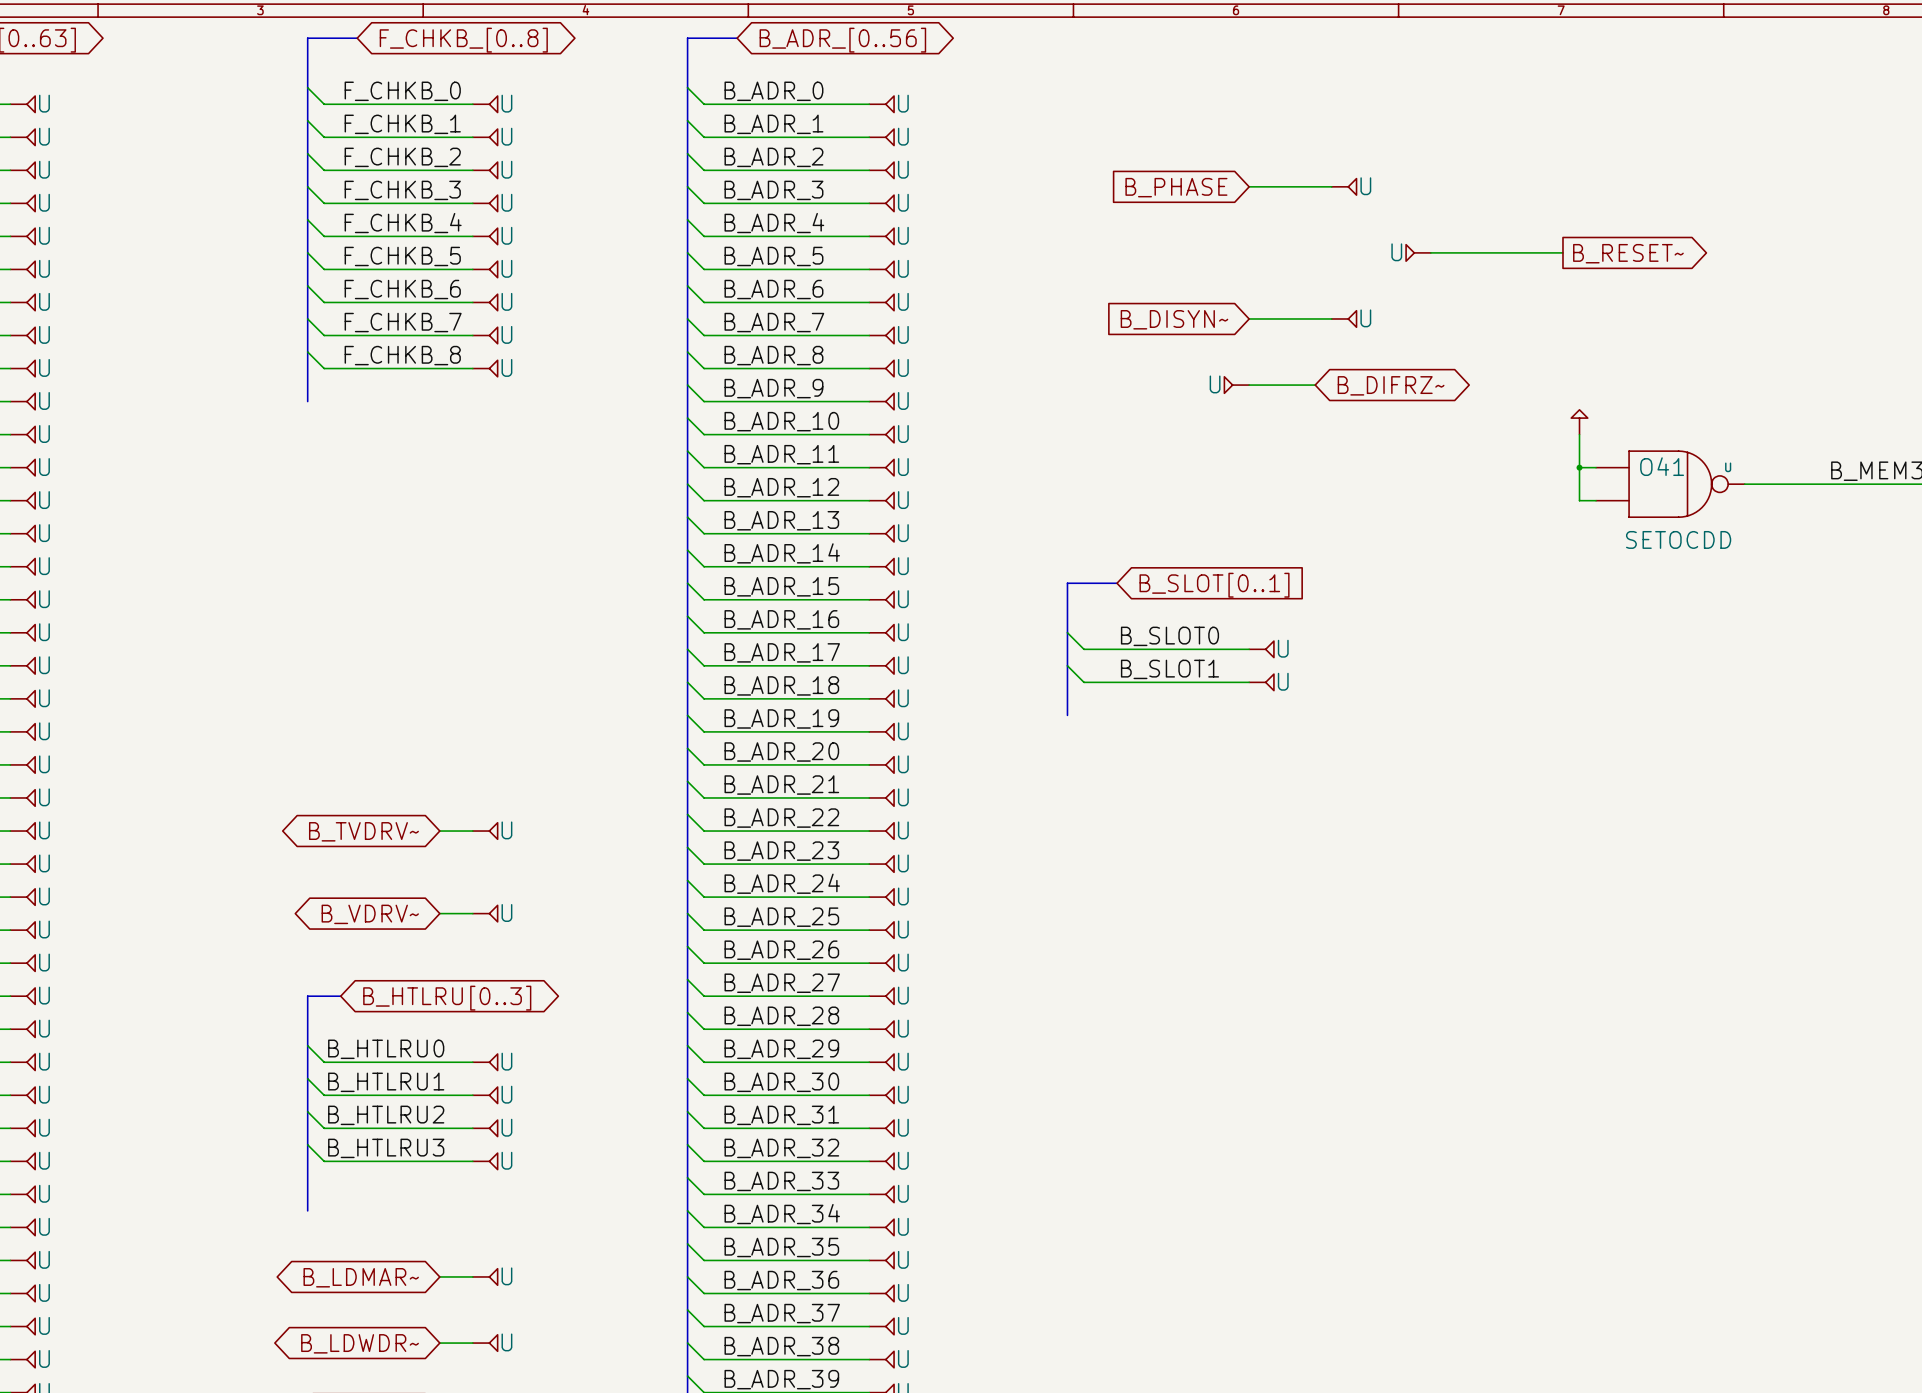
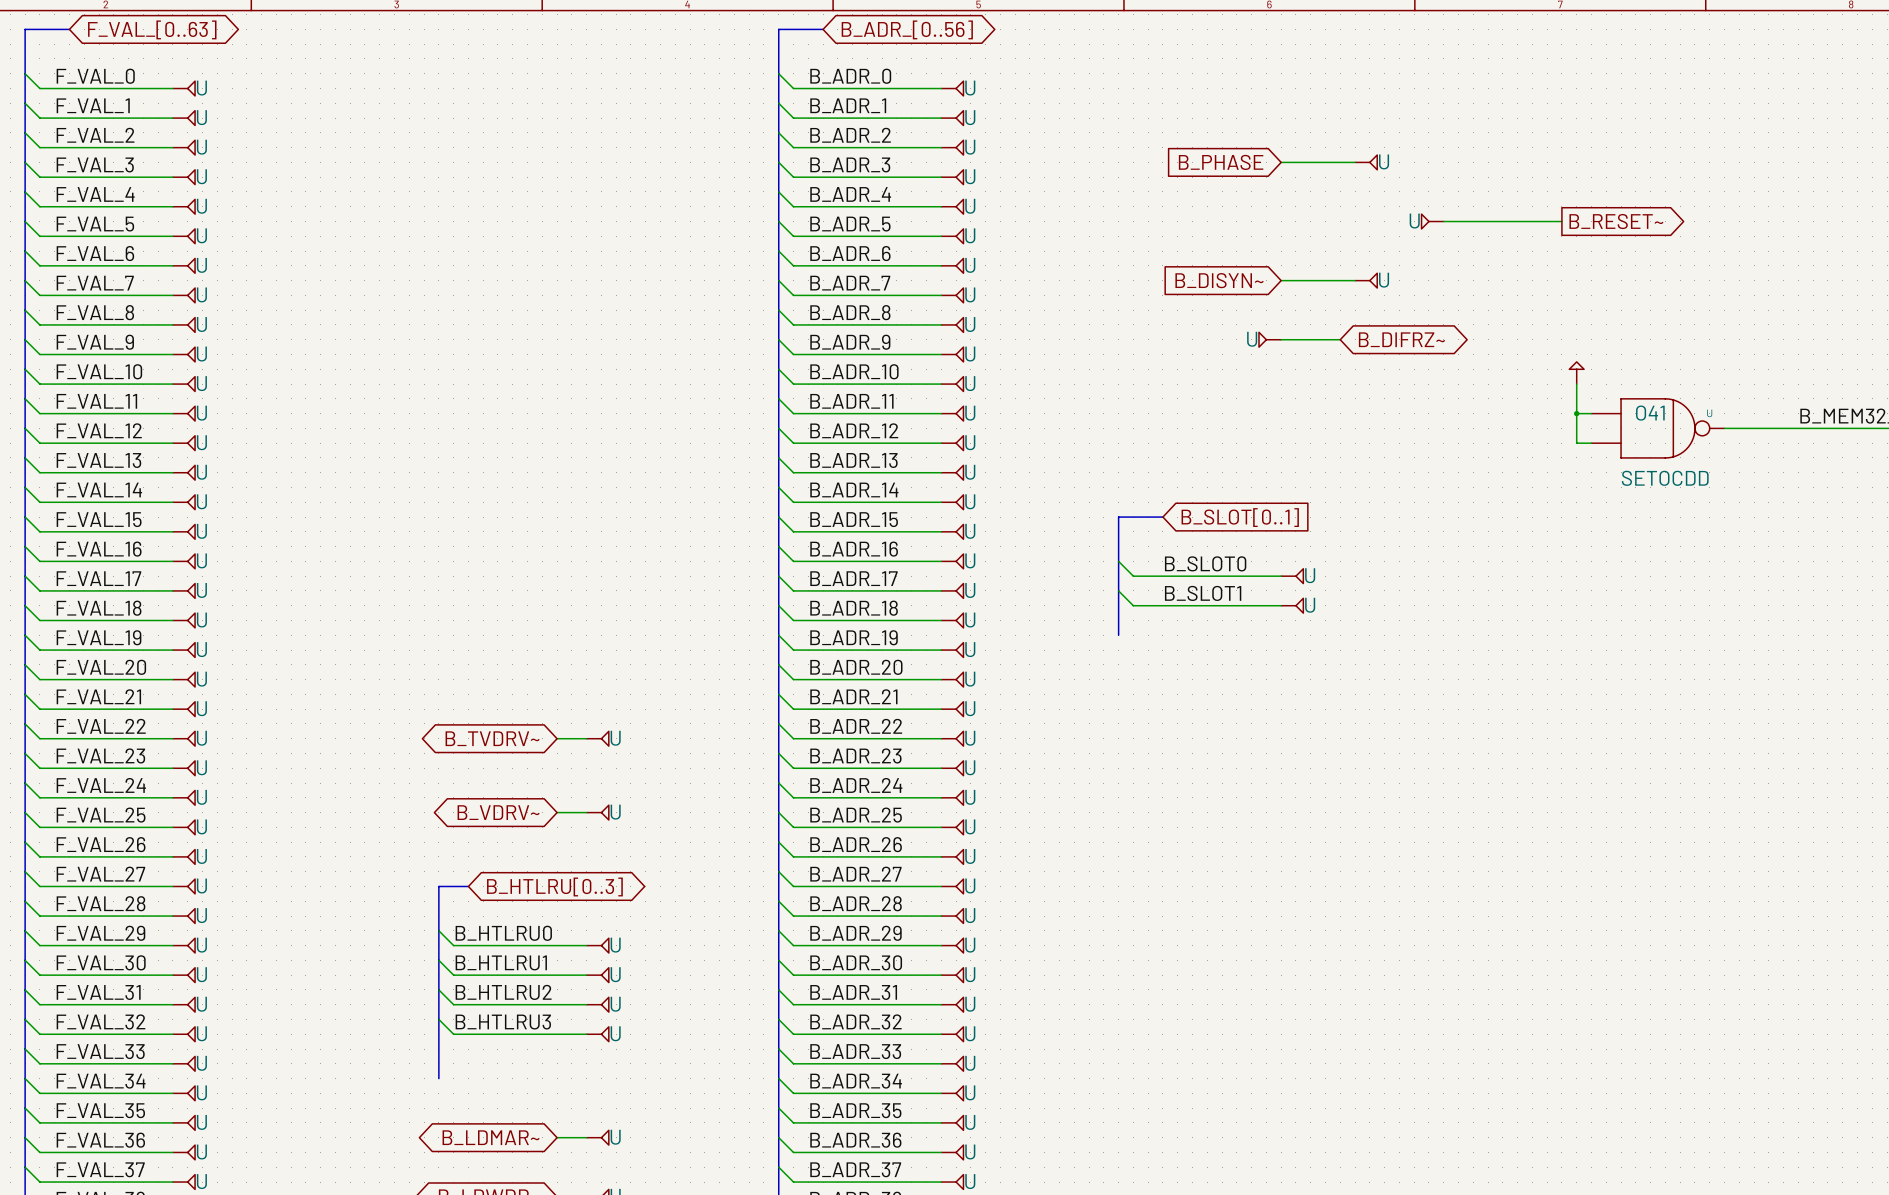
bus: (357, 38) (307, 38) (307, 401) -> none
global label: F_CHKB_[0..8] (463, 40) -> none
wire: (307, 87) (324, 104) (472, 104) -> none
label: F_CHKB_0 (402, 91) -> none
U: (485, 104) -> none
wire: (307, 120) (324, 137) (472, 137) -> none
label: F_CHKB_1 (402, 124) -> none
U: (485, 137) -> none
wire: (307, 153) (324, 170) (472, 170) -> none
label: F_CHKB_2 (402, 157) -> none
U: (485, 170) -> none
wire: (307, 186) (324, 203) (472, 203) -> none
label: F_CHKB_3 (402, 190) -> none
U: (485, 203) -> none
wire: (307, 219) (324, 236) (472, 236) -> none
label: F_CHKB_4 (403, 223) -> none
U: (485, 236) -> none
wire: (307, 252) (324, 269) (472, 269) -> none
label: F_CHKB_5 (402, 256) -> none
U: (485, 269) -> none
wire: (307, 285) (324, 302) (472, 302) -> none
label: F_CHKB_6 (402, 289) -> none
U: (485, 302) -> none
wire: (307, 318) (324, 335) (472, 335) -> none
label: F_CHKB_7 (403, 322) -> none
U: (485, 335) -> none
wire: (307, 352) (324, 368) (472, 368) -> none
label: F_CHKB_8 (402, 355) -> none
U: (485, 368) -> none

